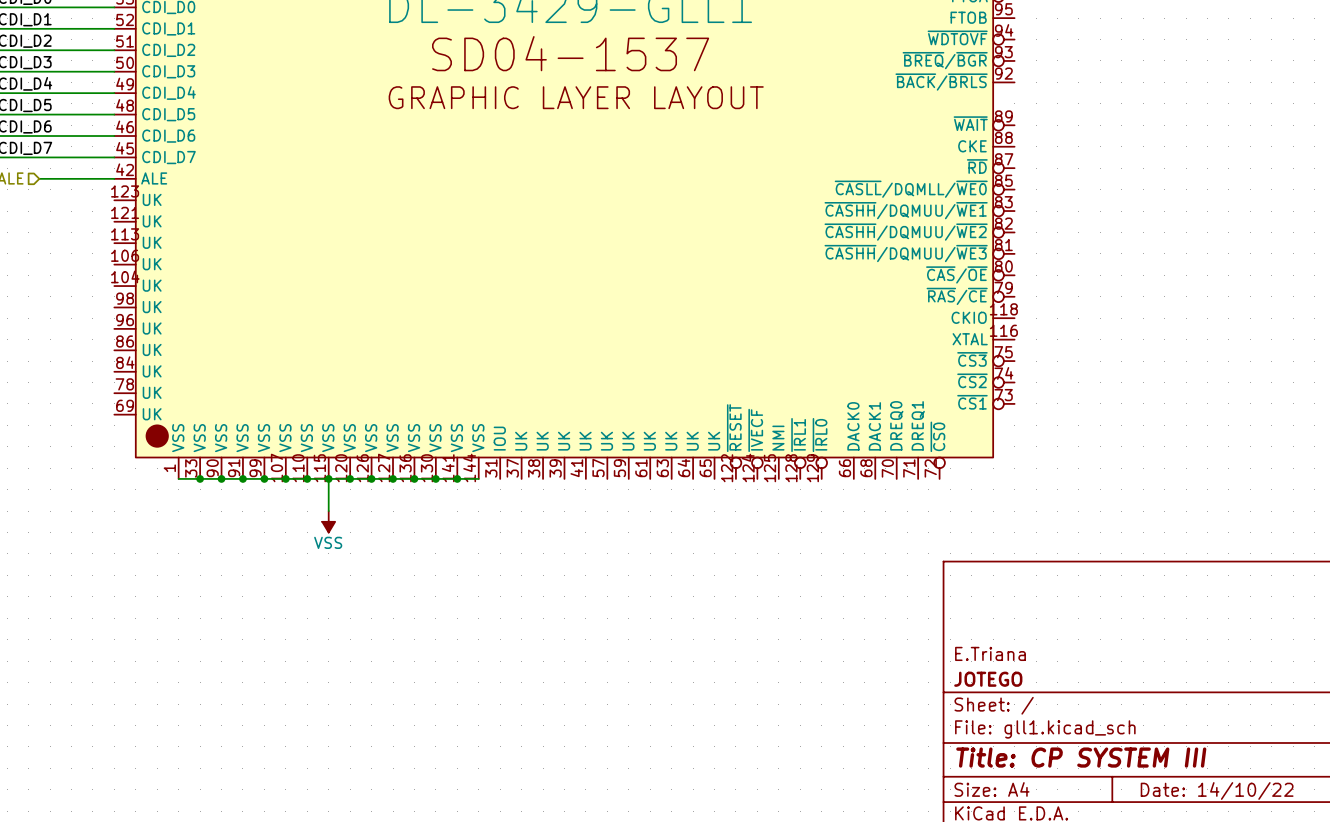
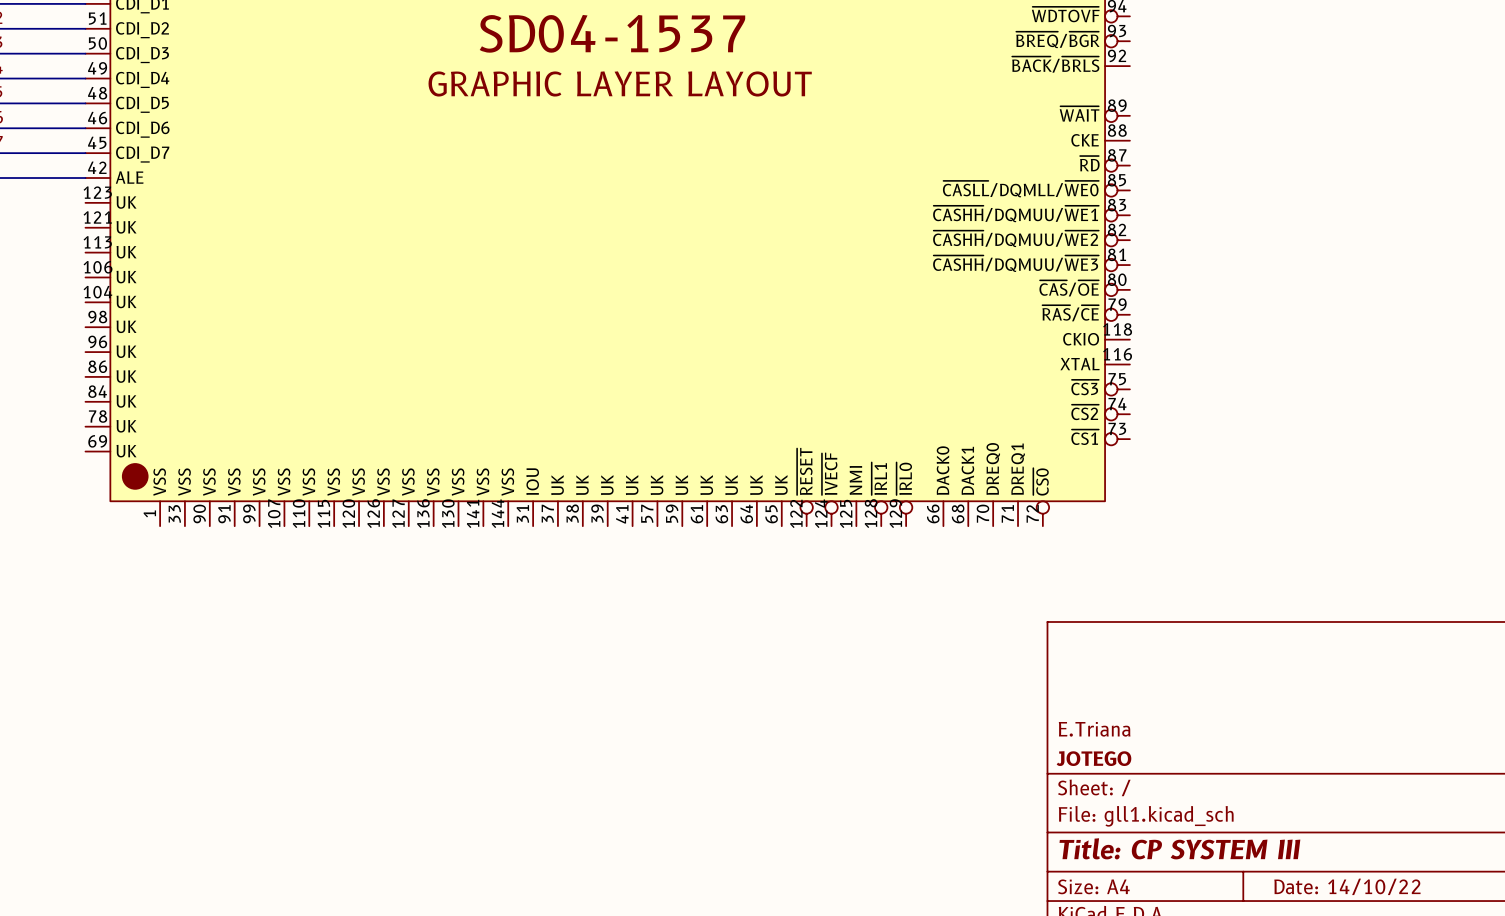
wire: (178, 478) (478, 478) -> none
junction: (200, 478) -> none
junction: (221, 478) -> none
junction: (242, 478) -> none
junction: (264, 478) -> none
junction: (285, 478) -> none
junction: (307, 478) -> none
wire: (328, 478) (328, 511) -> none
junction: (328, 478) -> none
junction: (350, 478) -> none
junction: (371, 478) -> none
junction: (393, 478) -> none
junction: (414, 478) -> none
junction: (435, 478) -> none
junction: (457, 478) -> none
power symbol: VSS (328, 521) -> none

